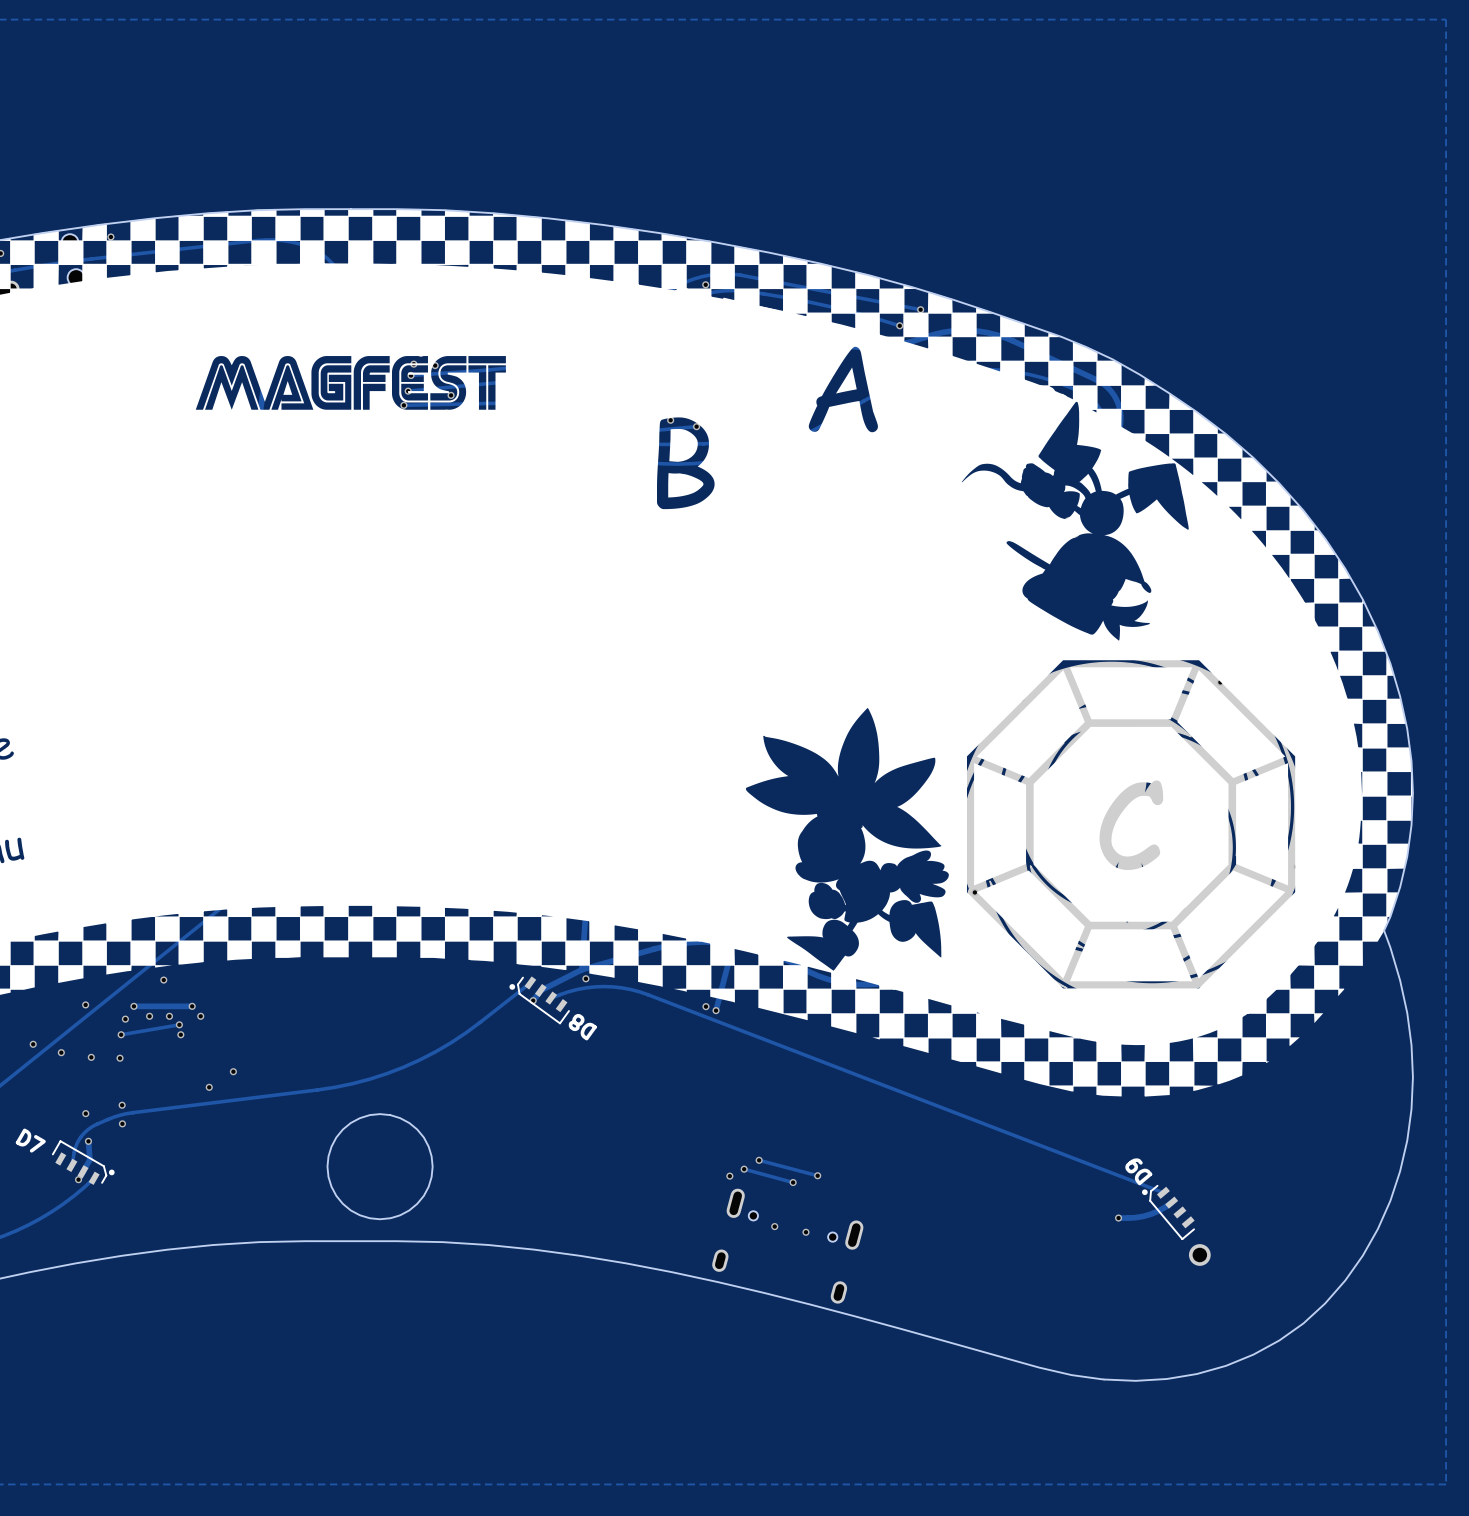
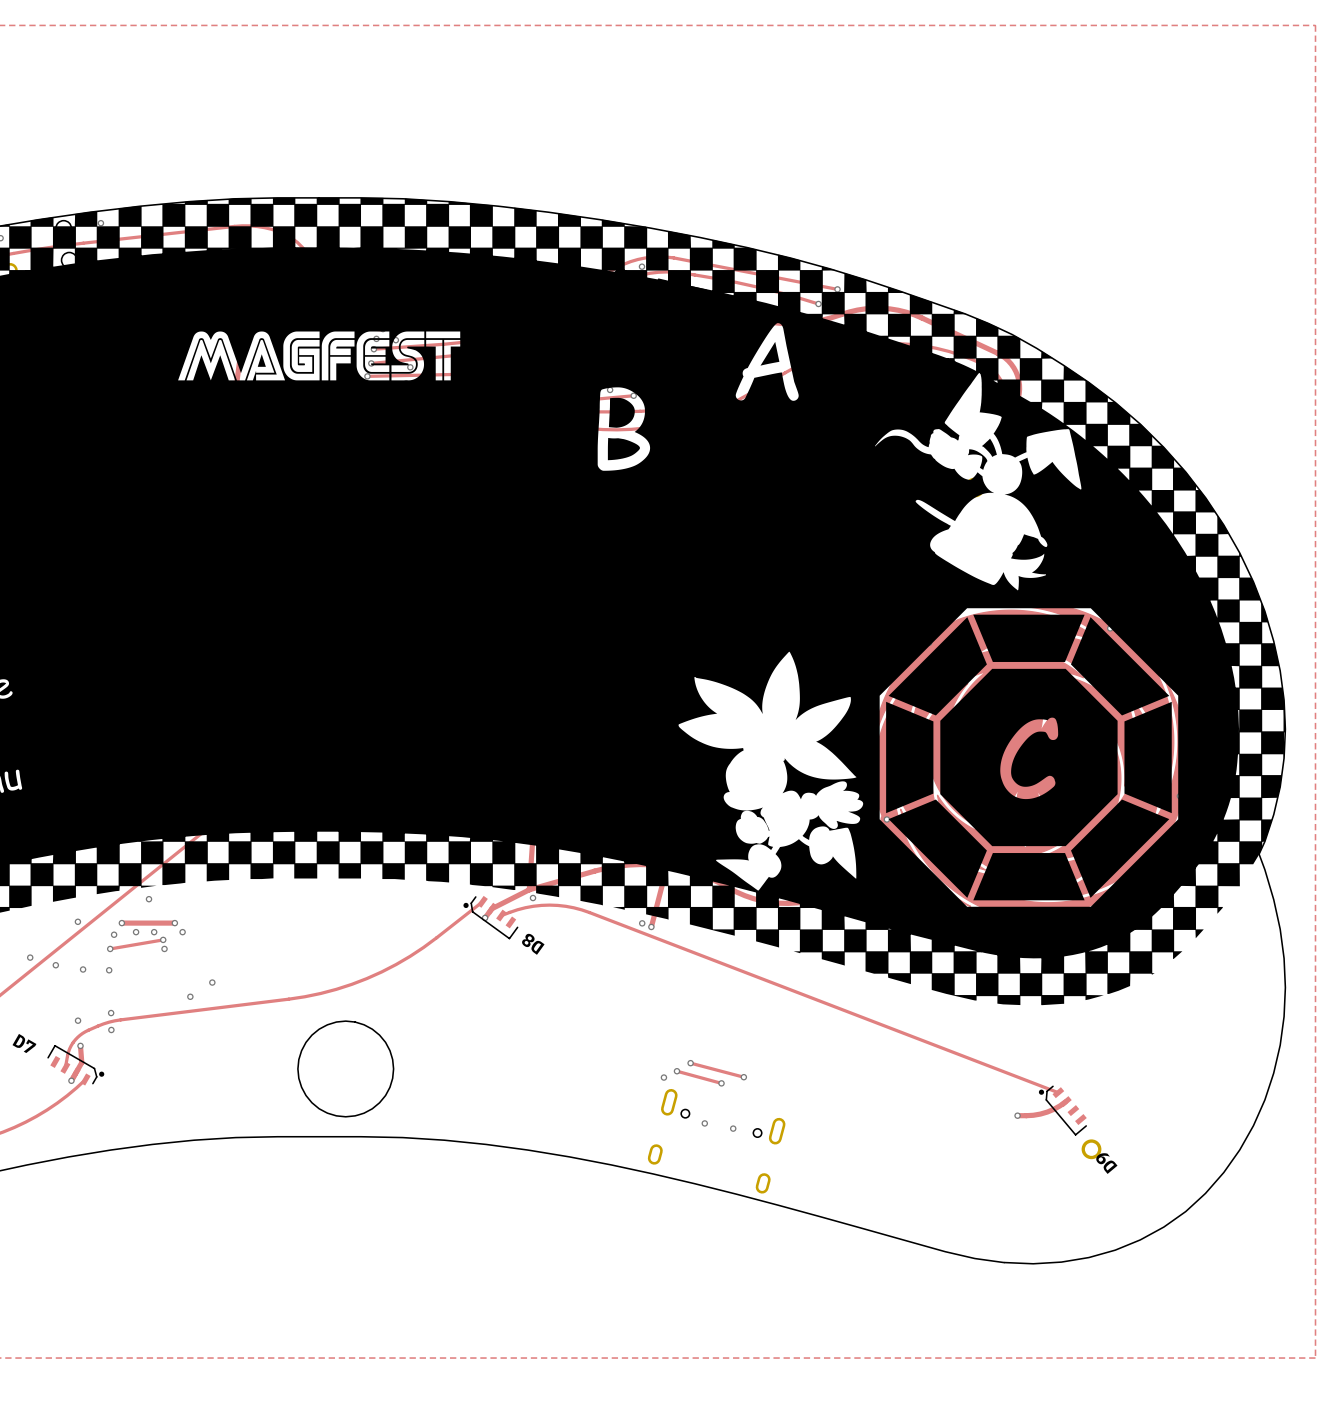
D9 name position: D9 (1138, 1171) -> D9 (1106, 1163)

